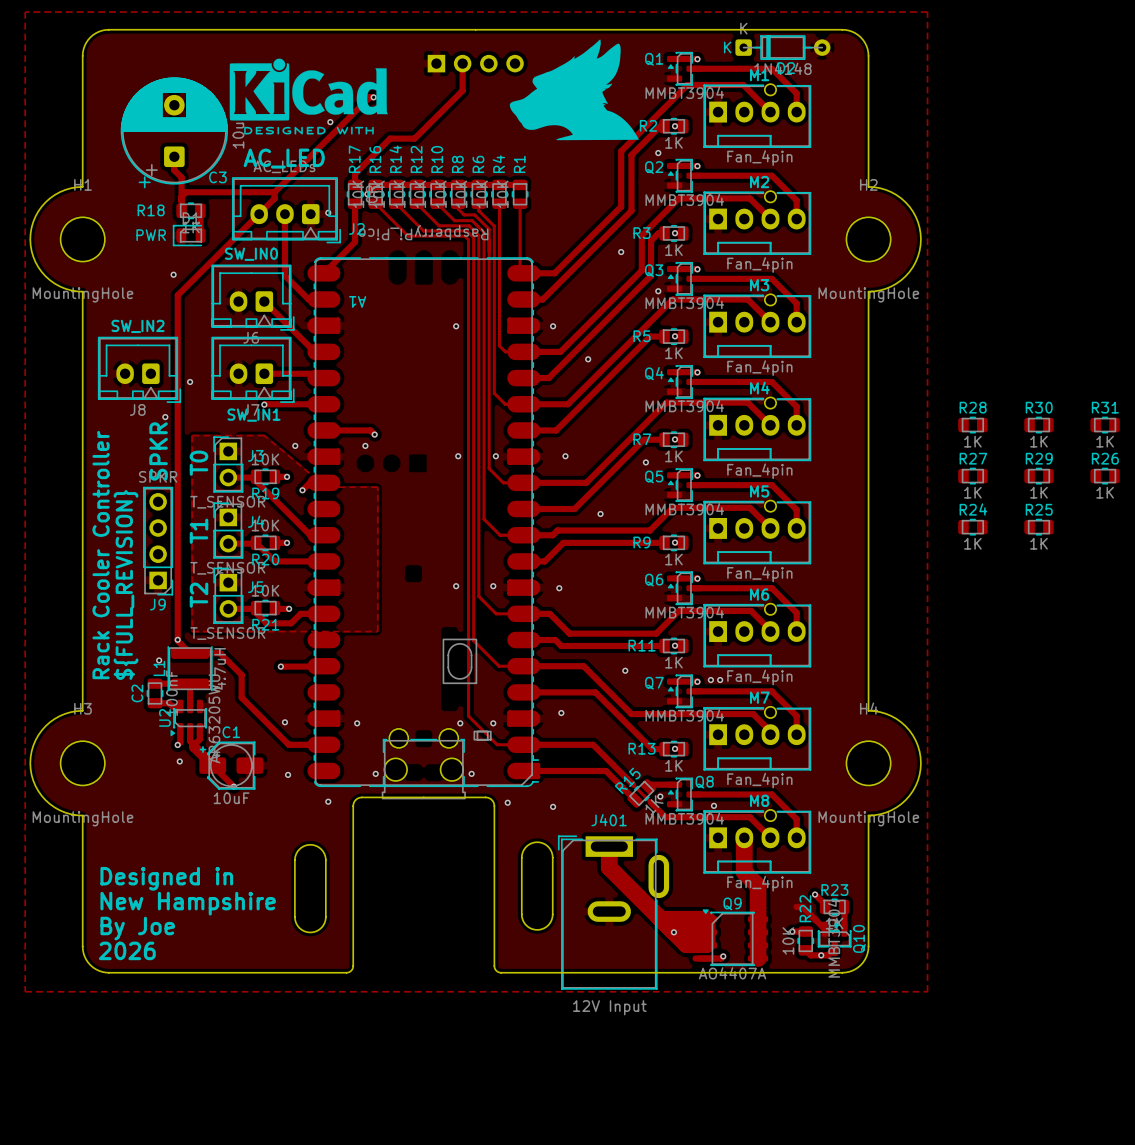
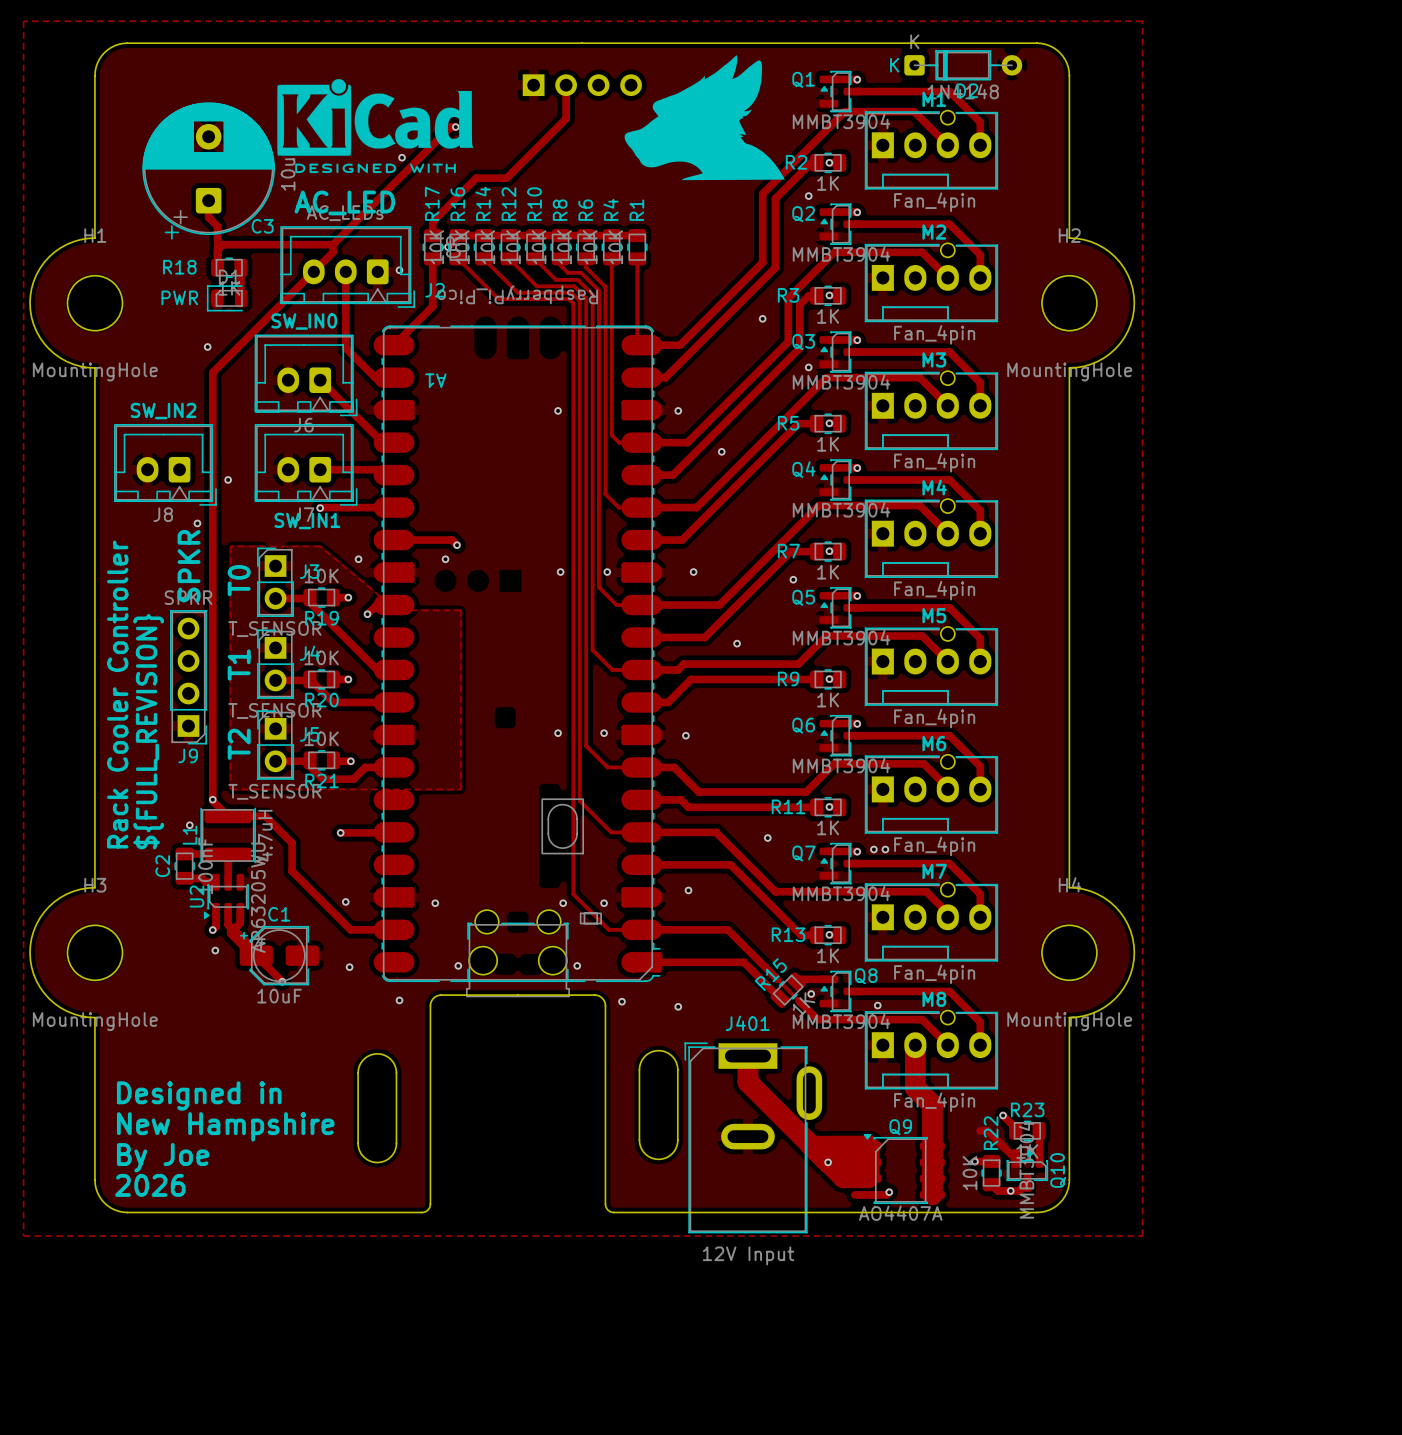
R28: 1K (972, 425) -> none
R30: 1K (1038, 425) -> none
R31: 1K (1105, 425) -> none
R27: 1K (972, 476) -> none
R29: 1K (1038, 476) -> none
R26: 1K (1105, 476) -> none
R24: 1K (972, 527) -> none
R25: 1K (1038, 527) -> none

